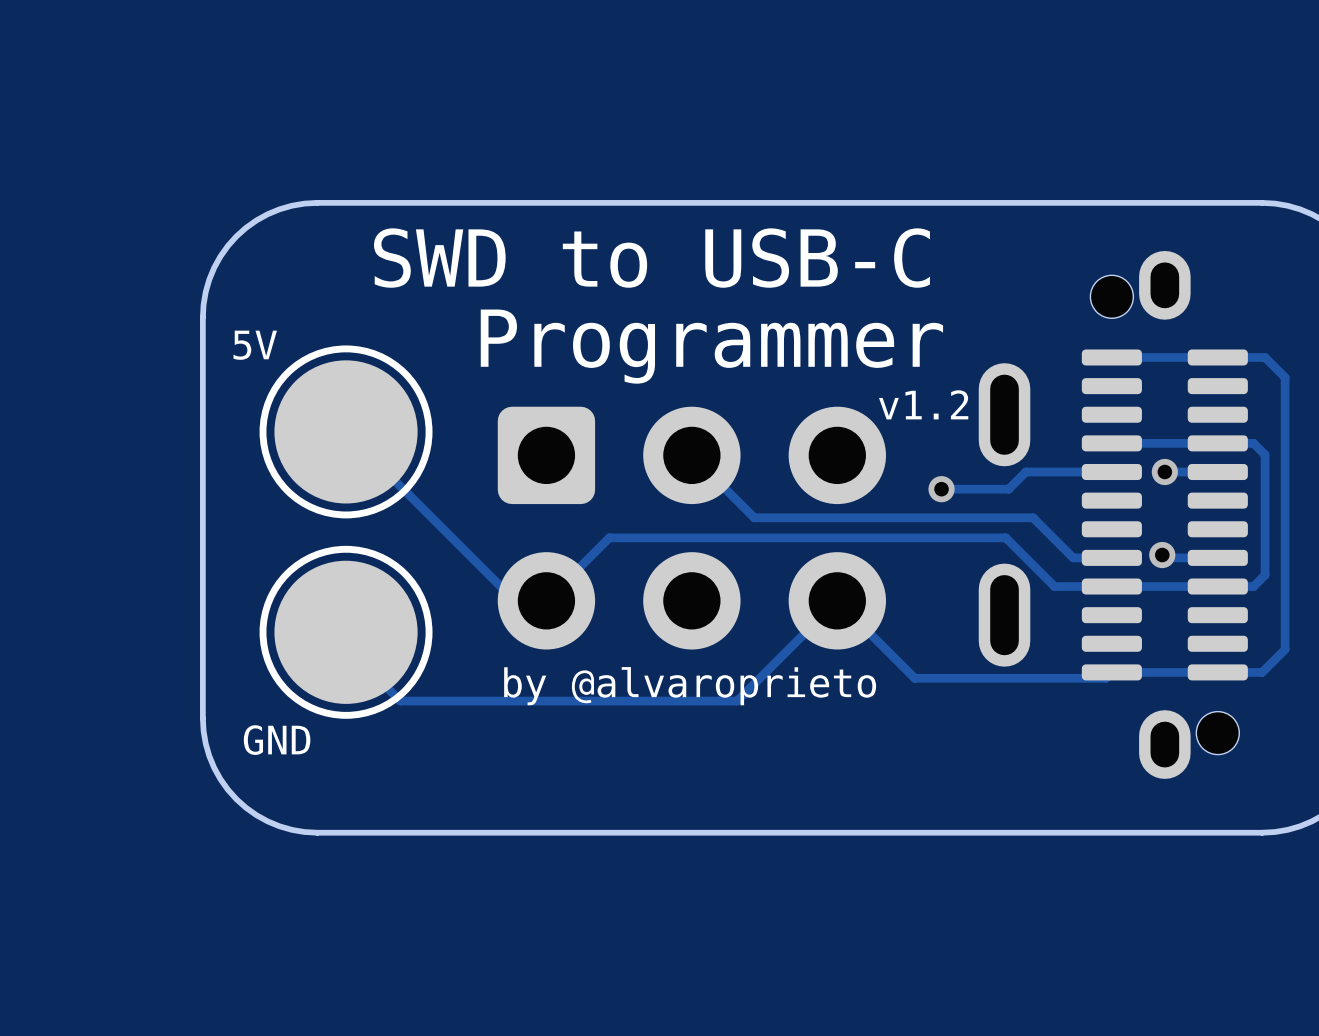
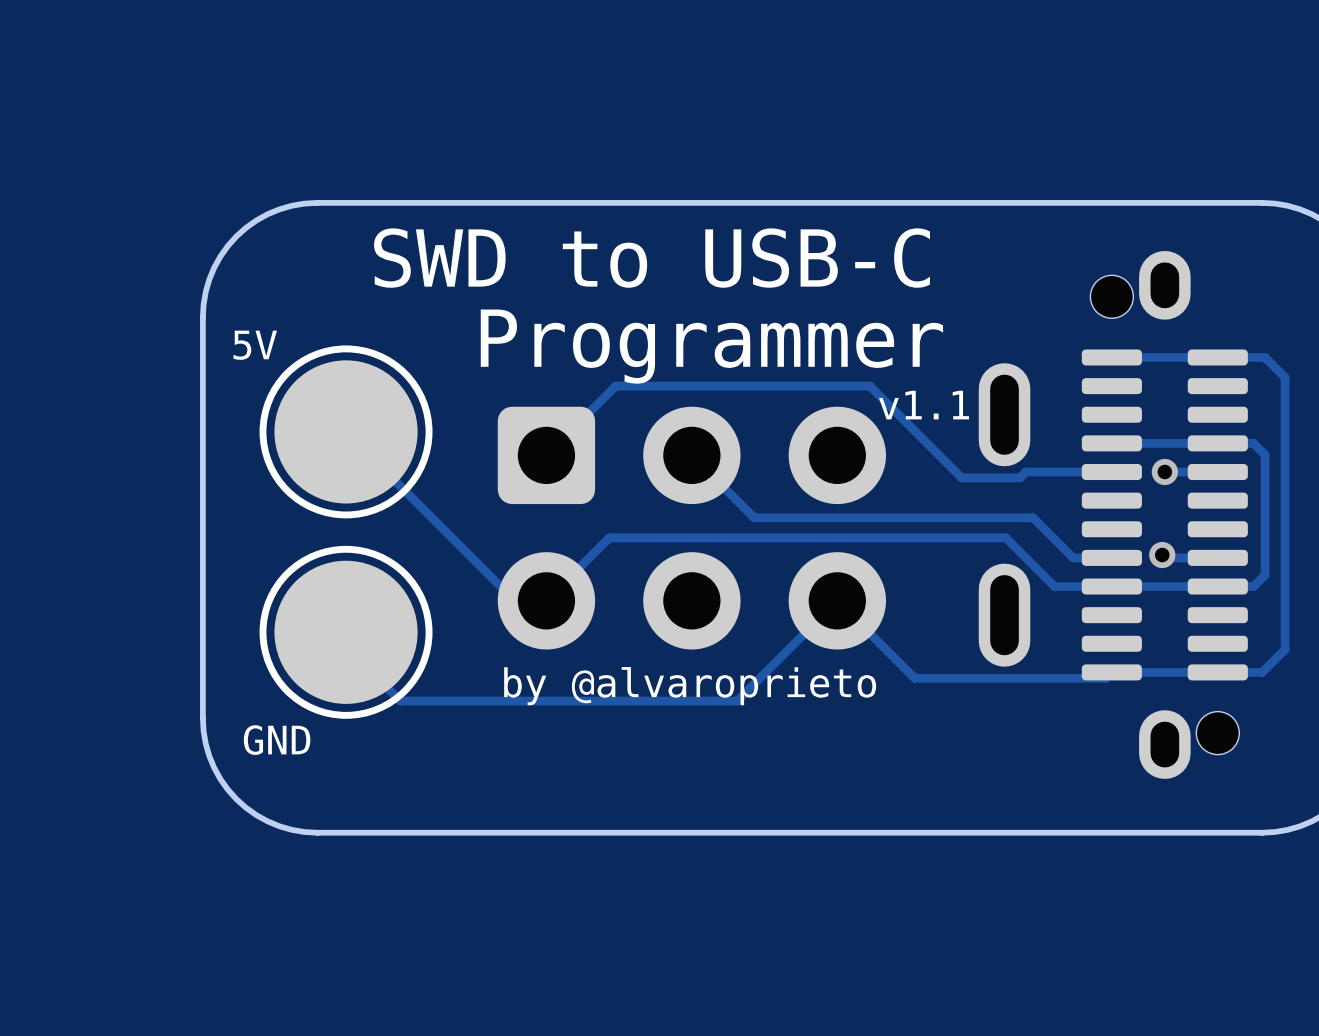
text: v1.2 (923, 404) -> v1.1 (923, 405)
track: (1020, 477) (1008, 489) (941, 489) -> (1020, 477) (961, 477) (869, 386) (615, 386) (546, 455)
via: (941, 489) -> none

